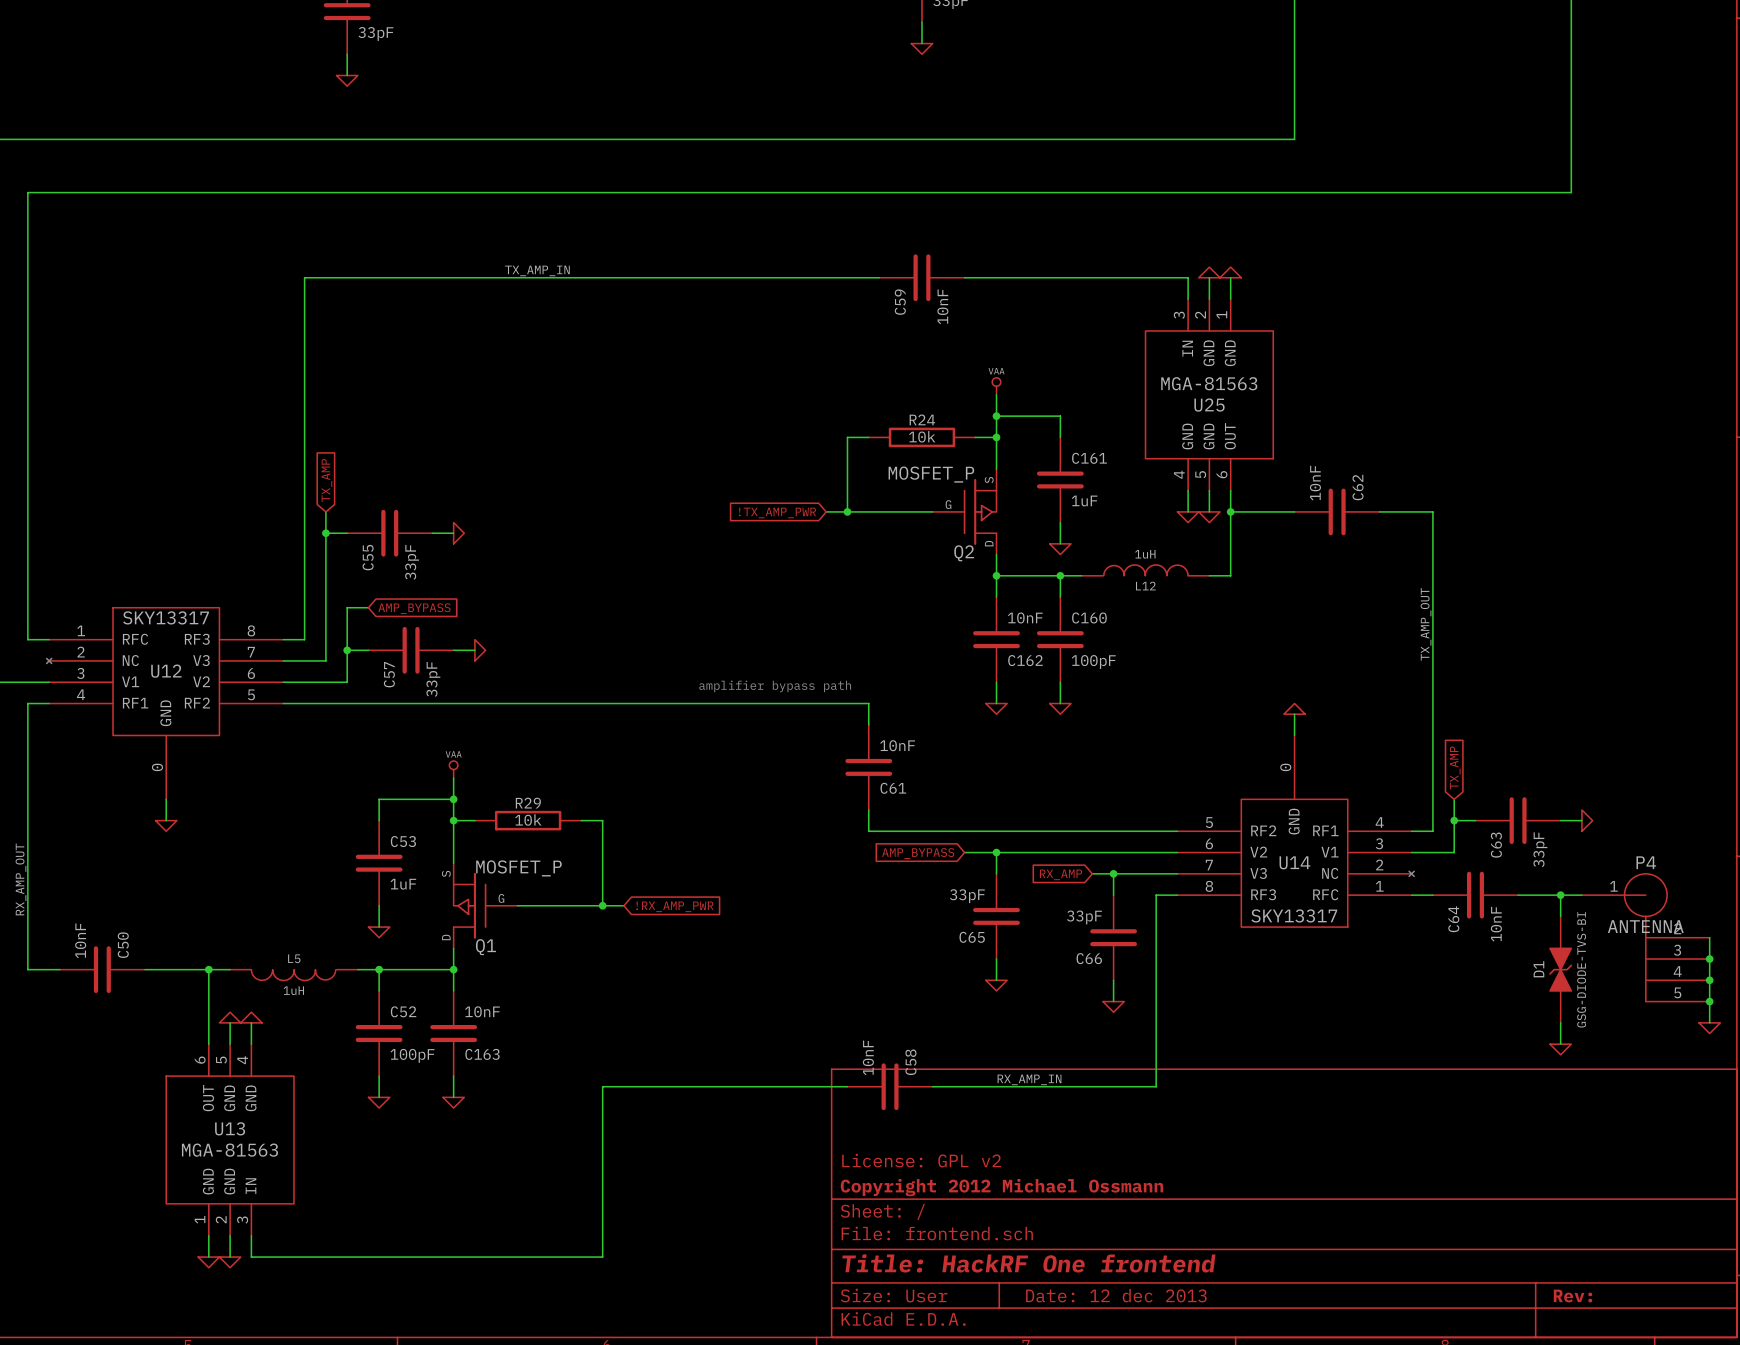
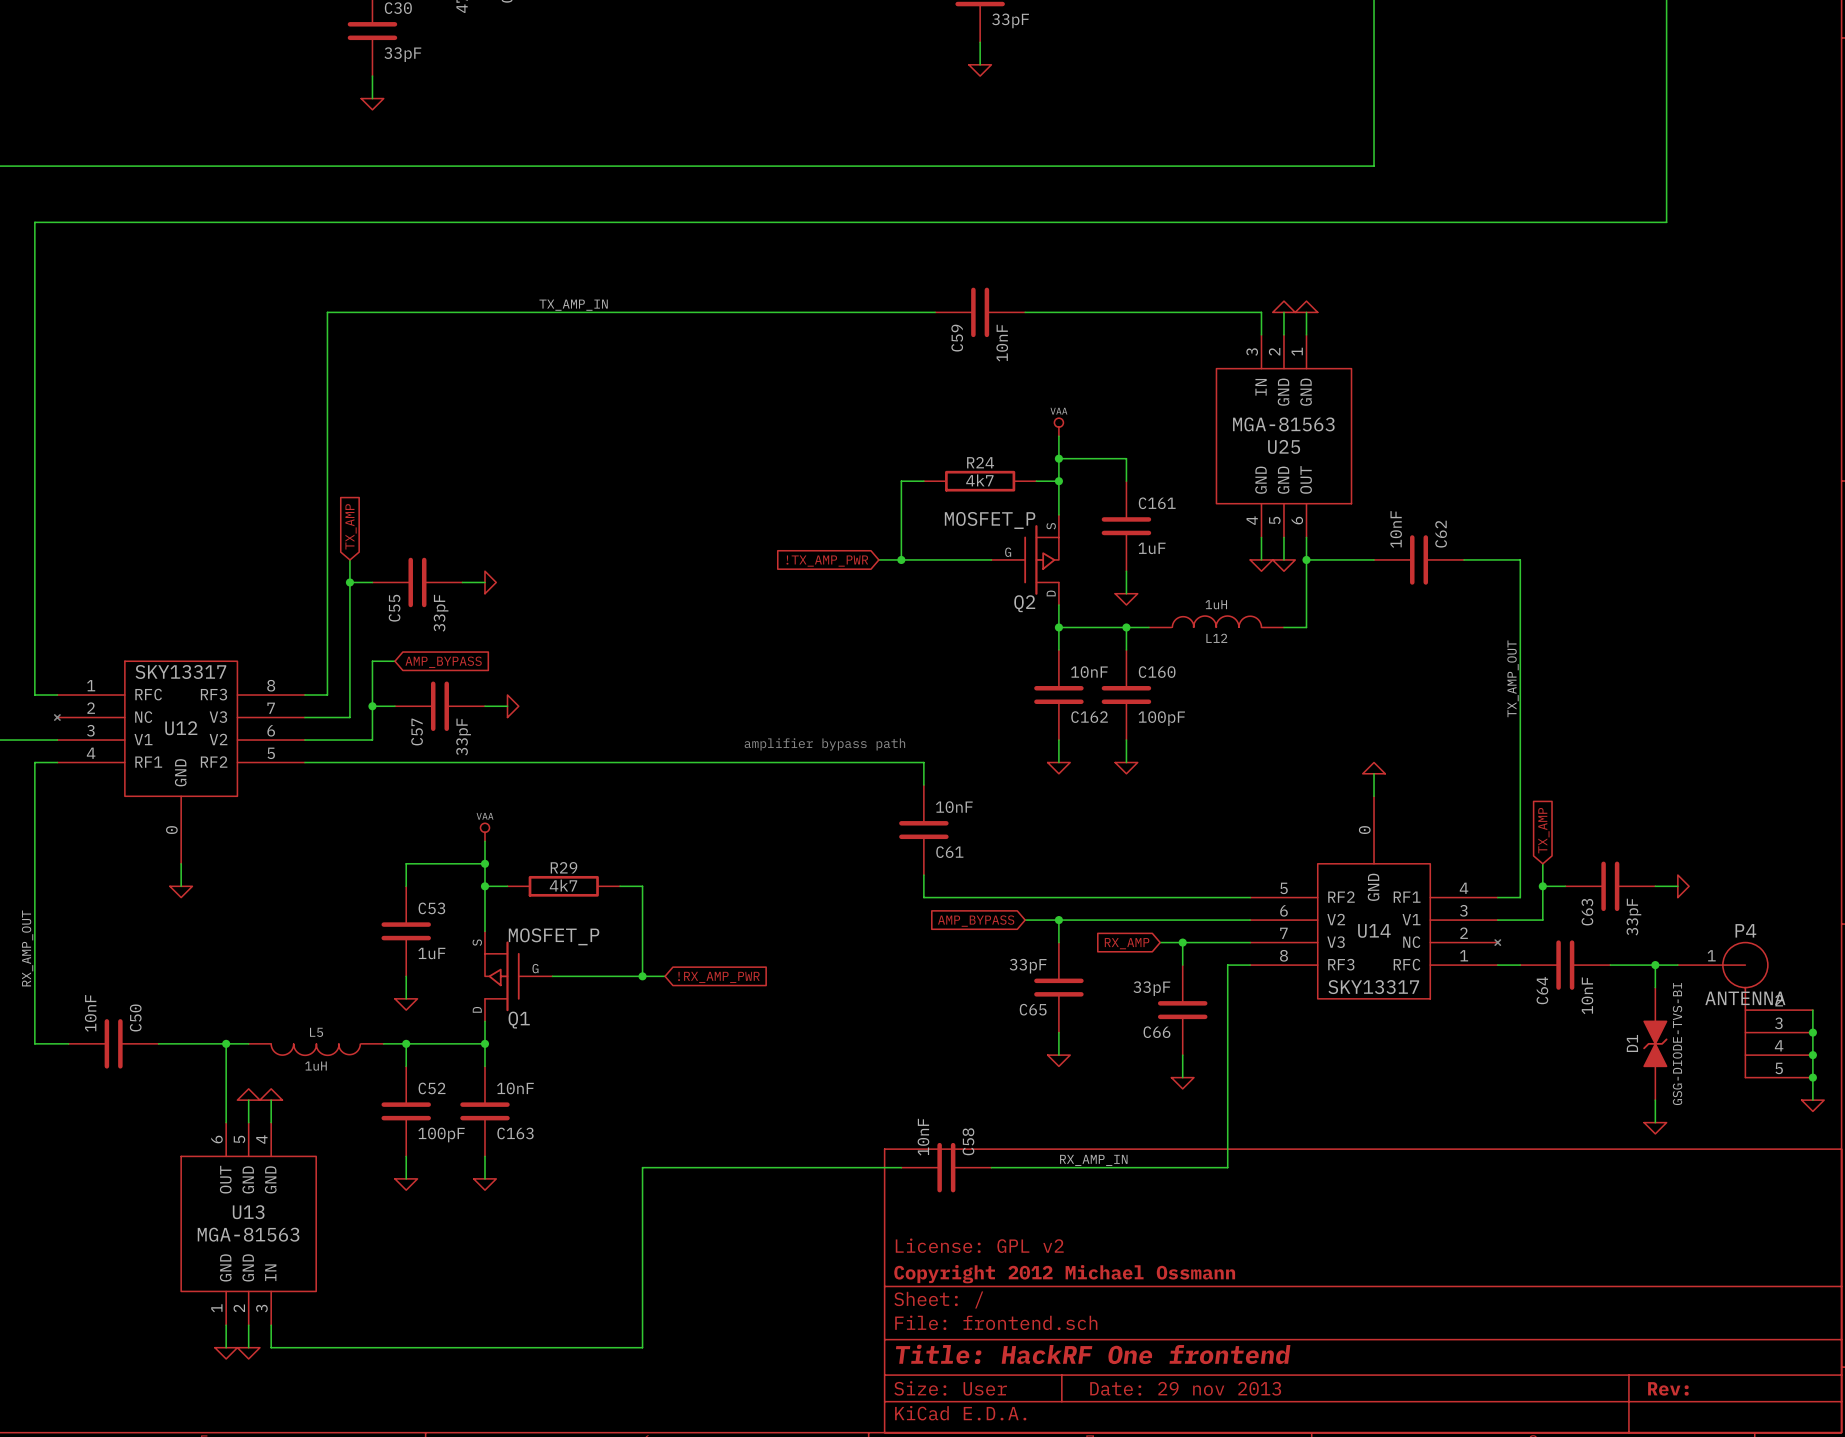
R24 value: 10k (922, 436) -> 4k7 (979, 480)
R29 value: 10k (528, 820) -> 4k7 (563, 885)
title block: Date: 12 dec 2013 (1116, 1295) -> Date: 29 nov 2013 (1185, 1388)

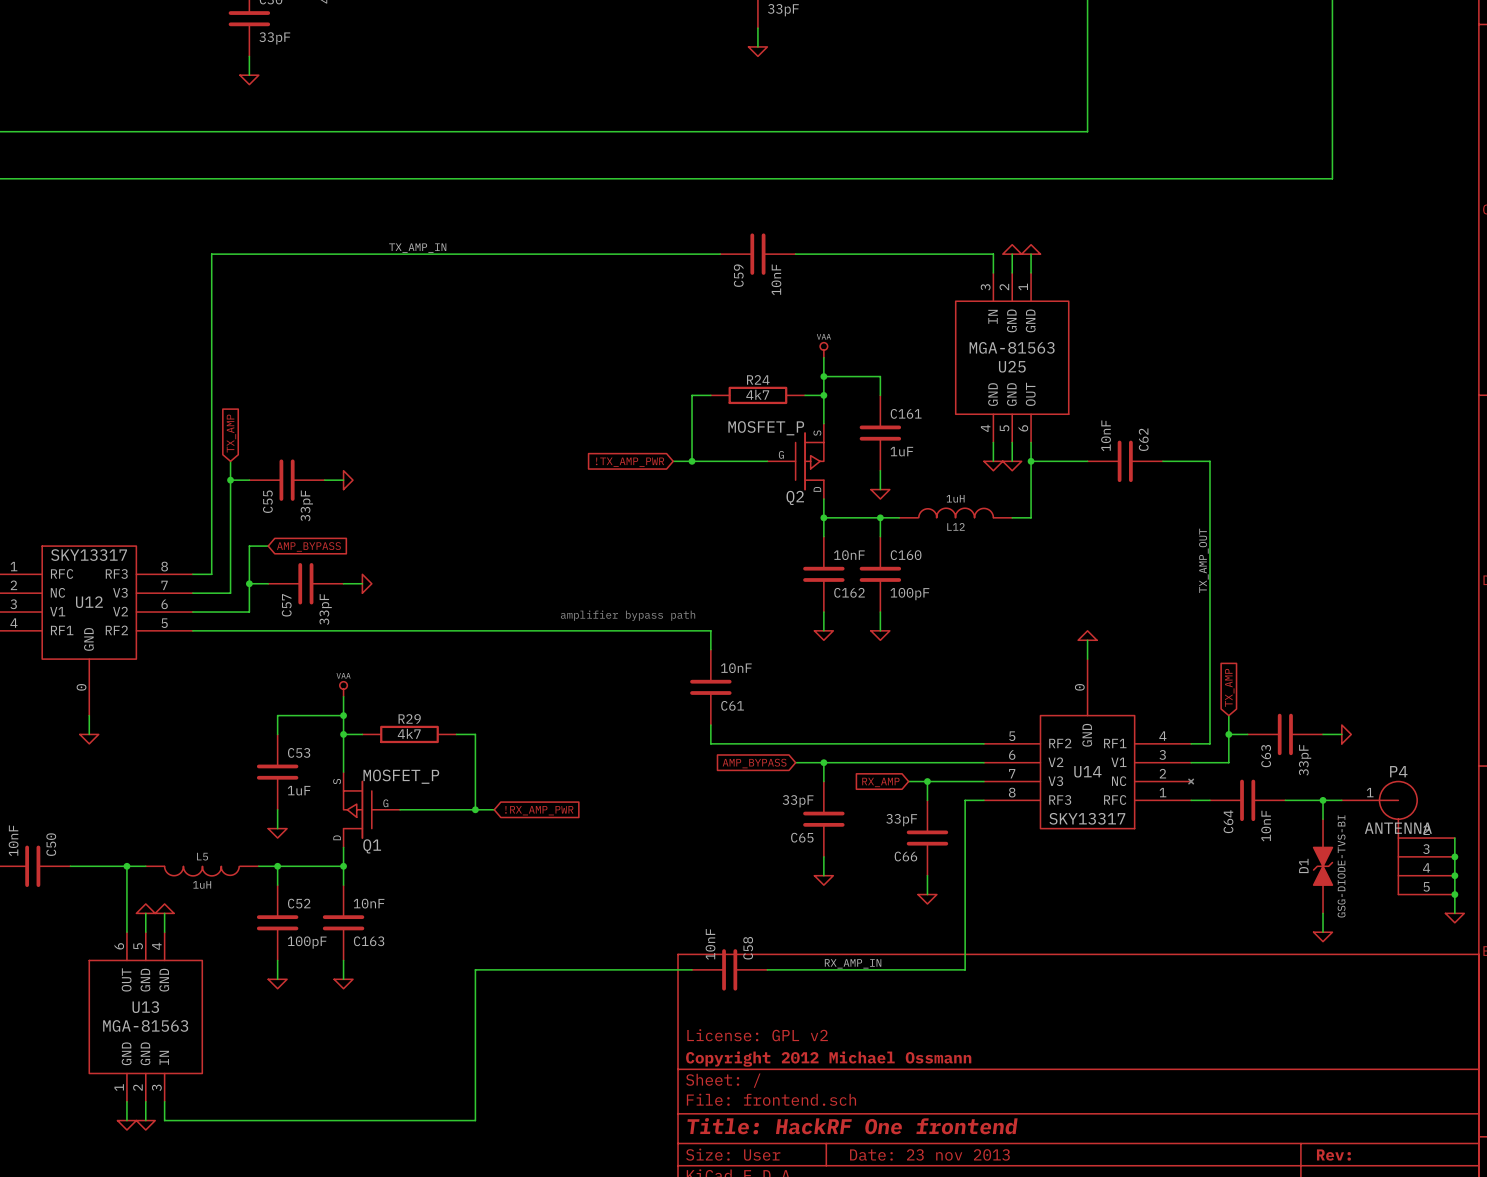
title block: Date: 29 nov 2013 (1185, 1388) -> Date: 23 nov 2013 (929, 1154)

